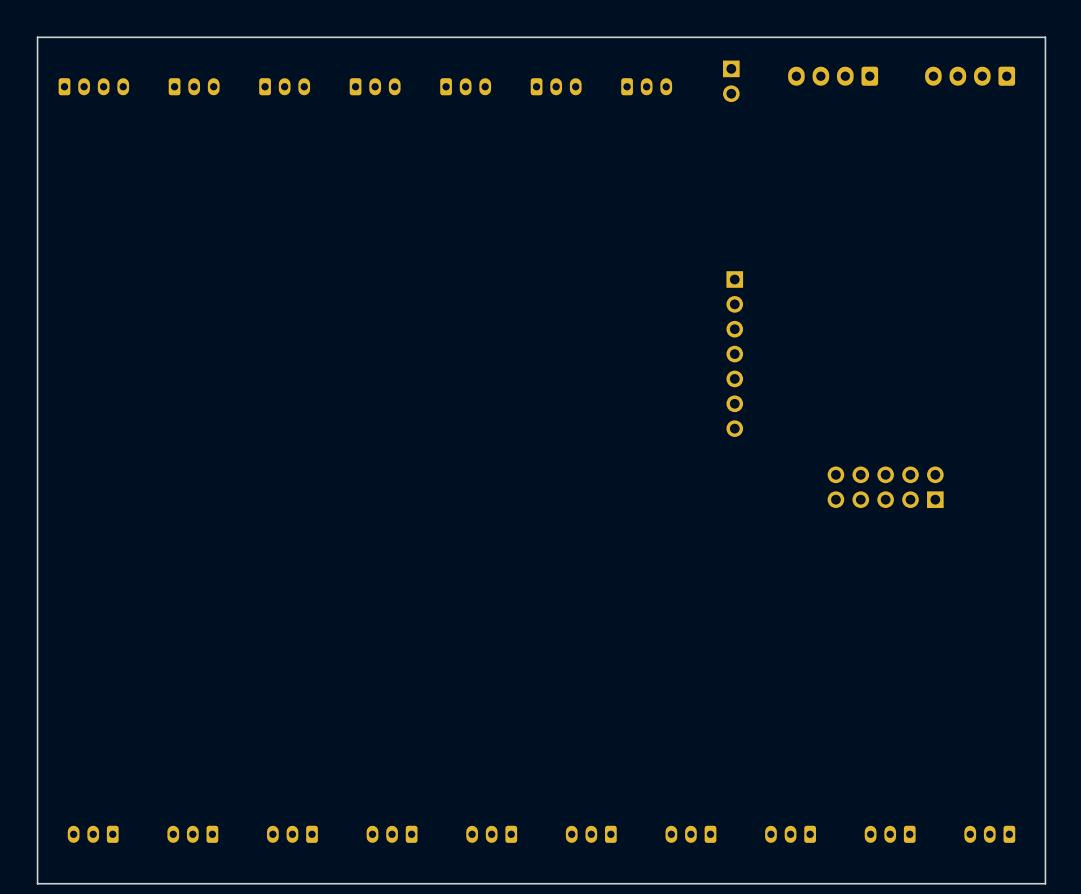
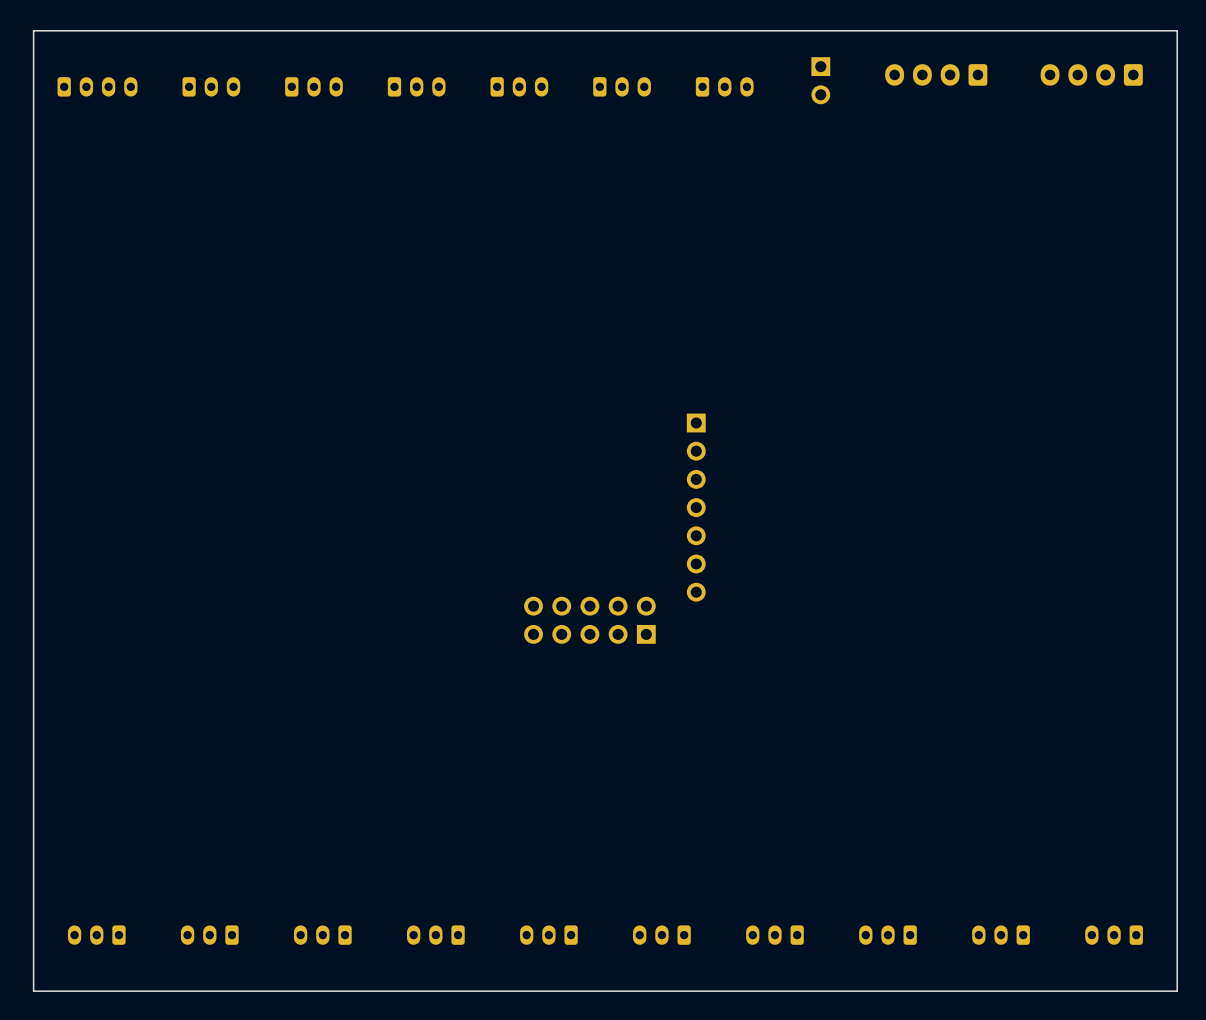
part position: (734, 354) -> (696, 507)
part: (885, 487) -> none
part: none -> (589, 620)

